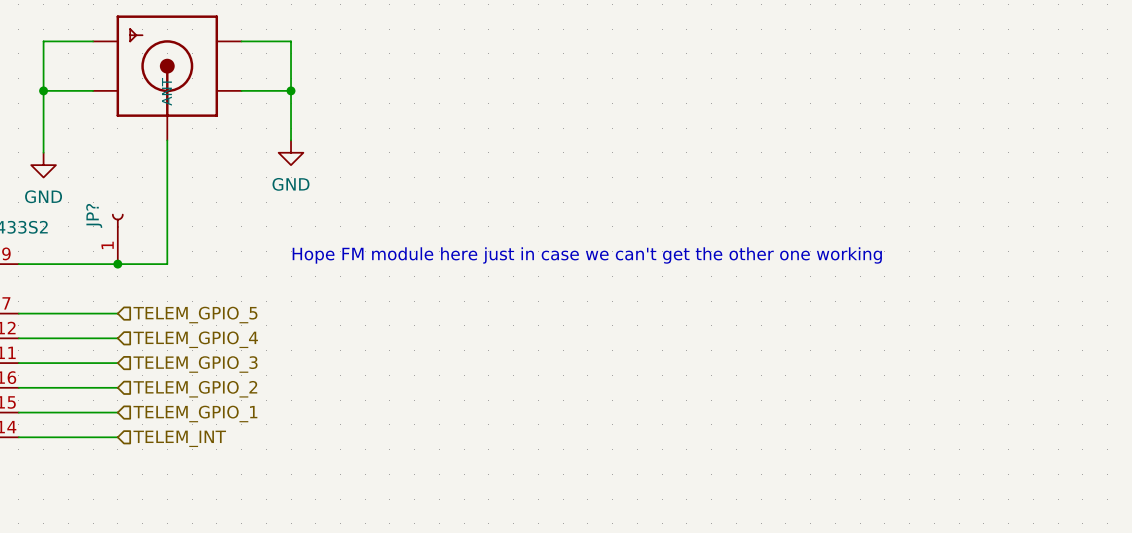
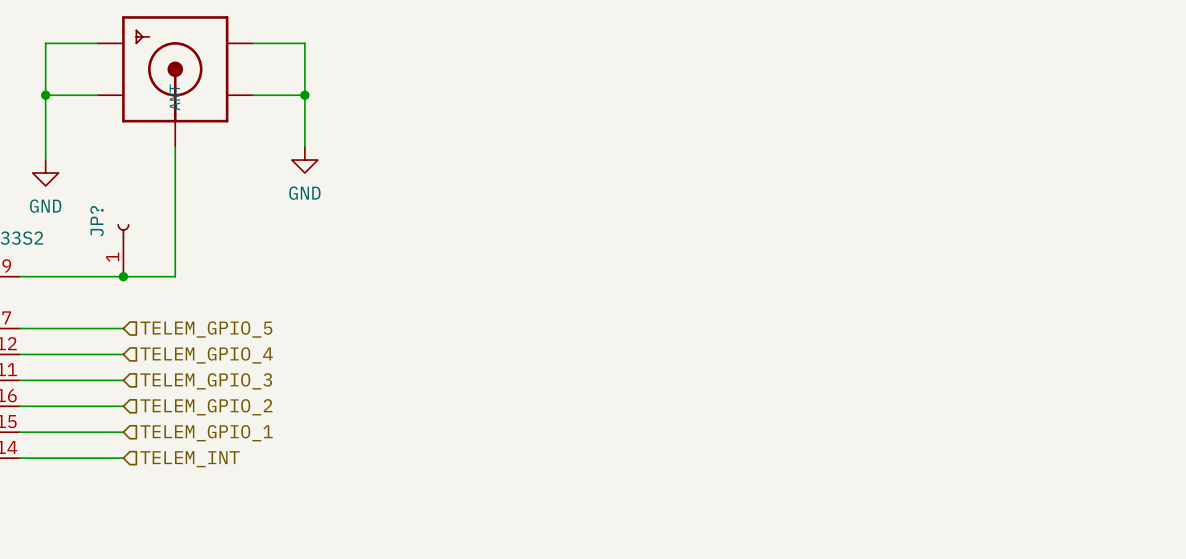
text: Hope FM module here just in case we can't get the other one working (587, 255) -> none

